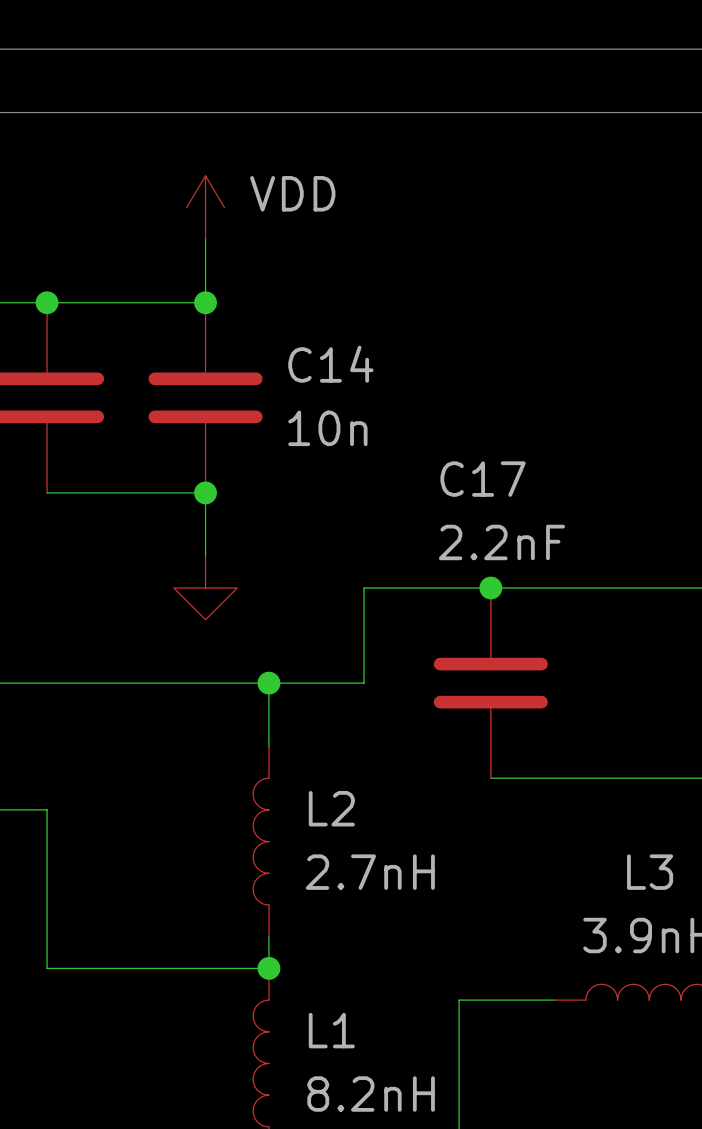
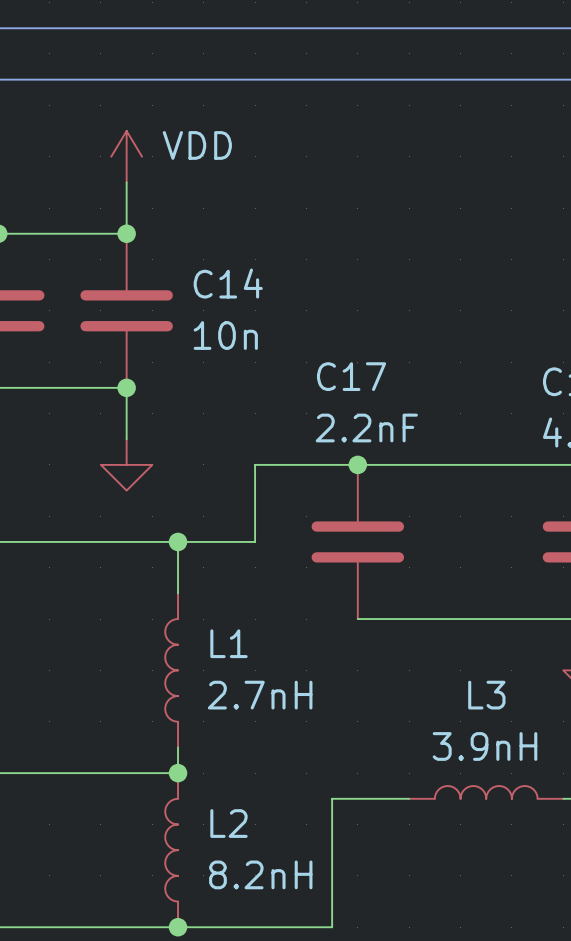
L2 name: L2 (331, 808) -> L1 (228, 643)
L1 name: L1 (331, 1030) -> L2 (228, 823)

